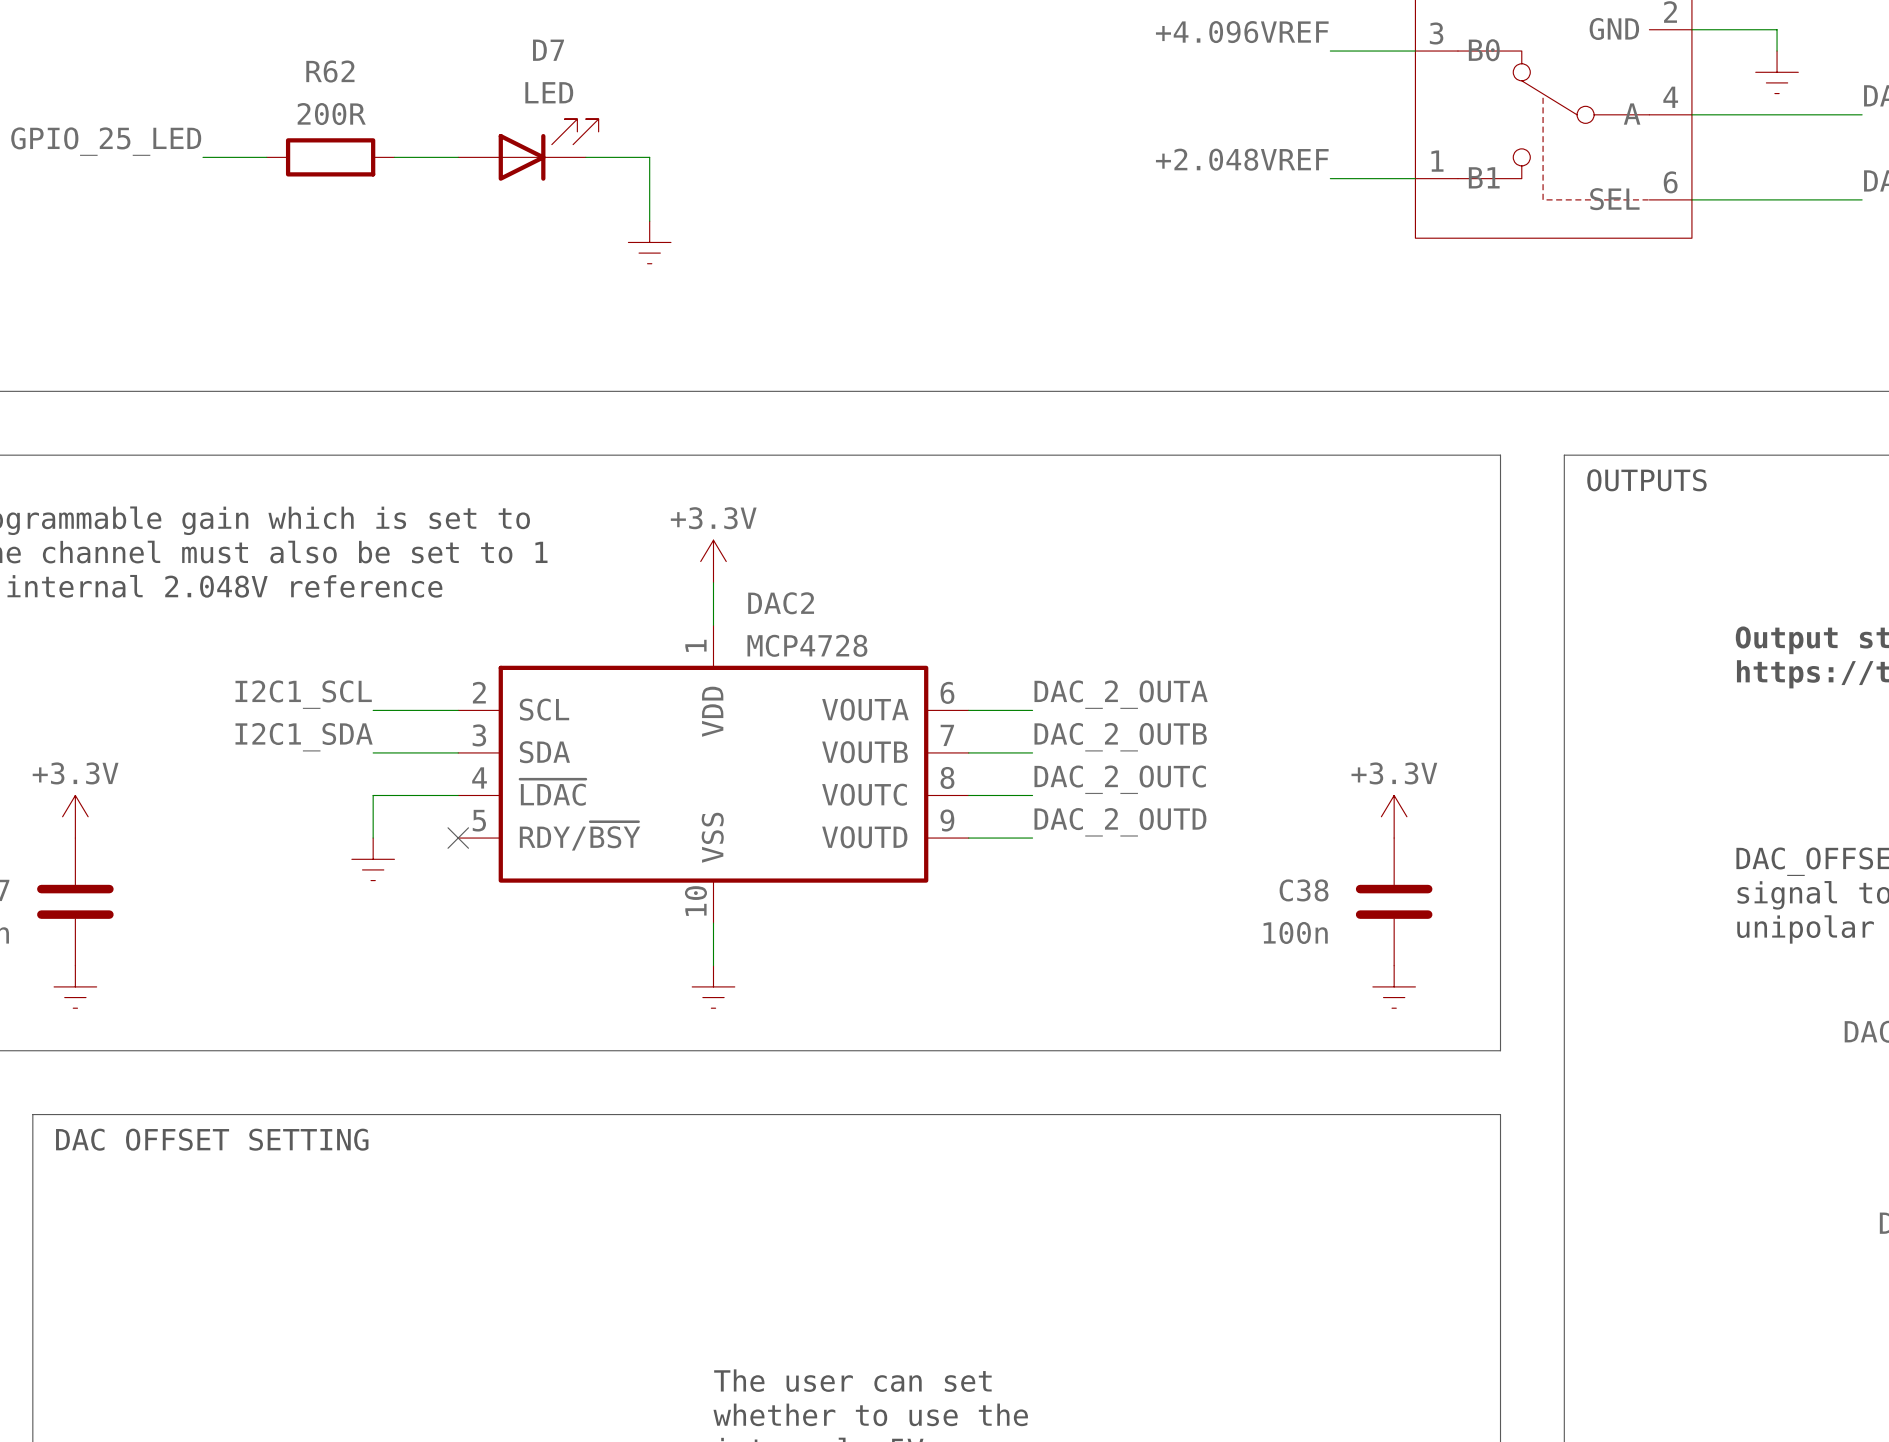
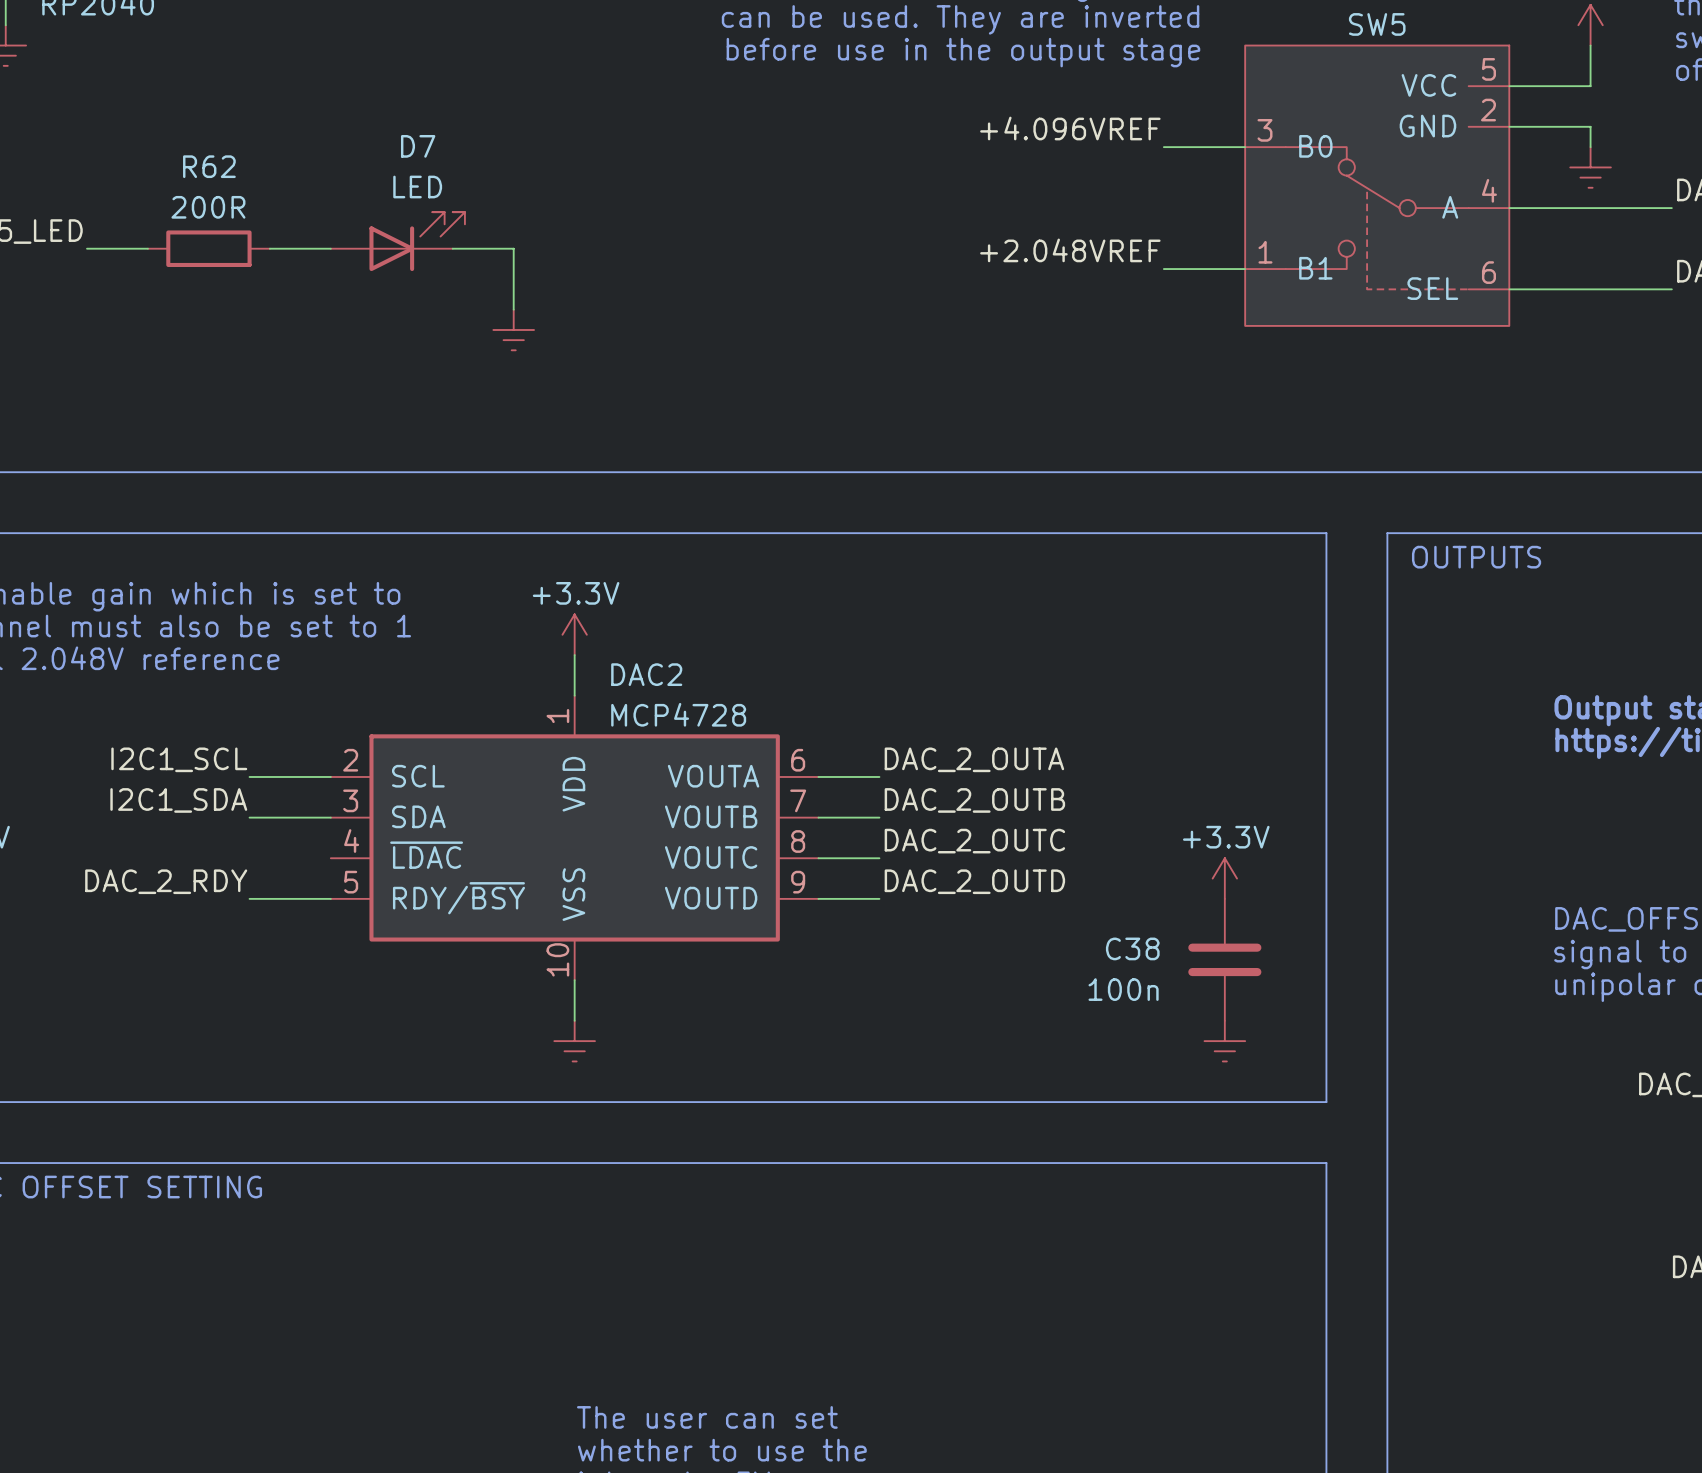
wire: (458, 795) (373, 795) (373, 838) -> (330, 898) (249, 898)
label: none -> DAC_2_RDY (166, 881)
no-connect mark: (458, 838) -> none
power symbol: (373, 859) -> none

